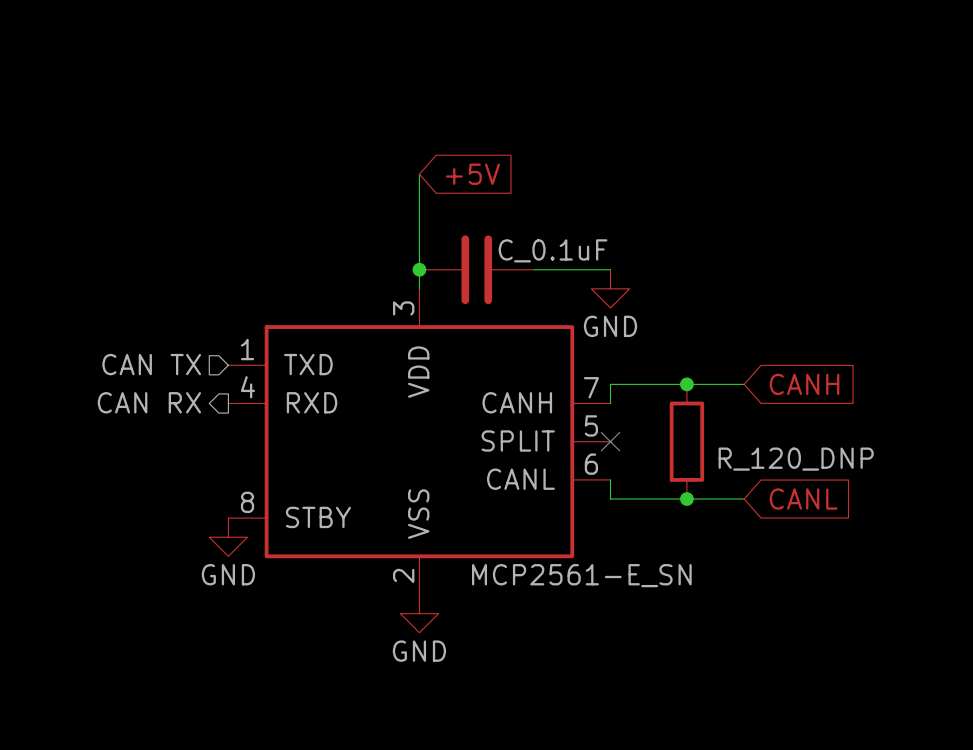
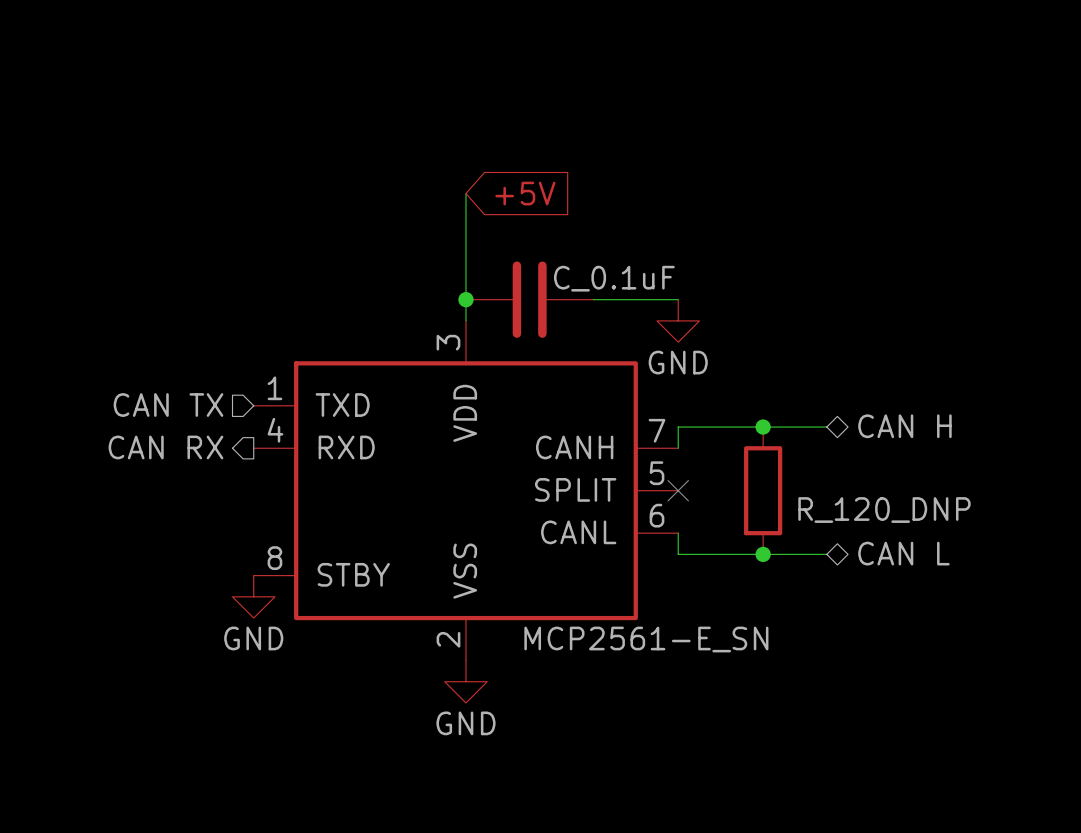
hierarchical label: none -> CAN H (904, 426)
global label: CANH (804, 384) -> none
hierarchical label: none -> CAN L (903, 553)
global label: CANL (803, 499) -> none

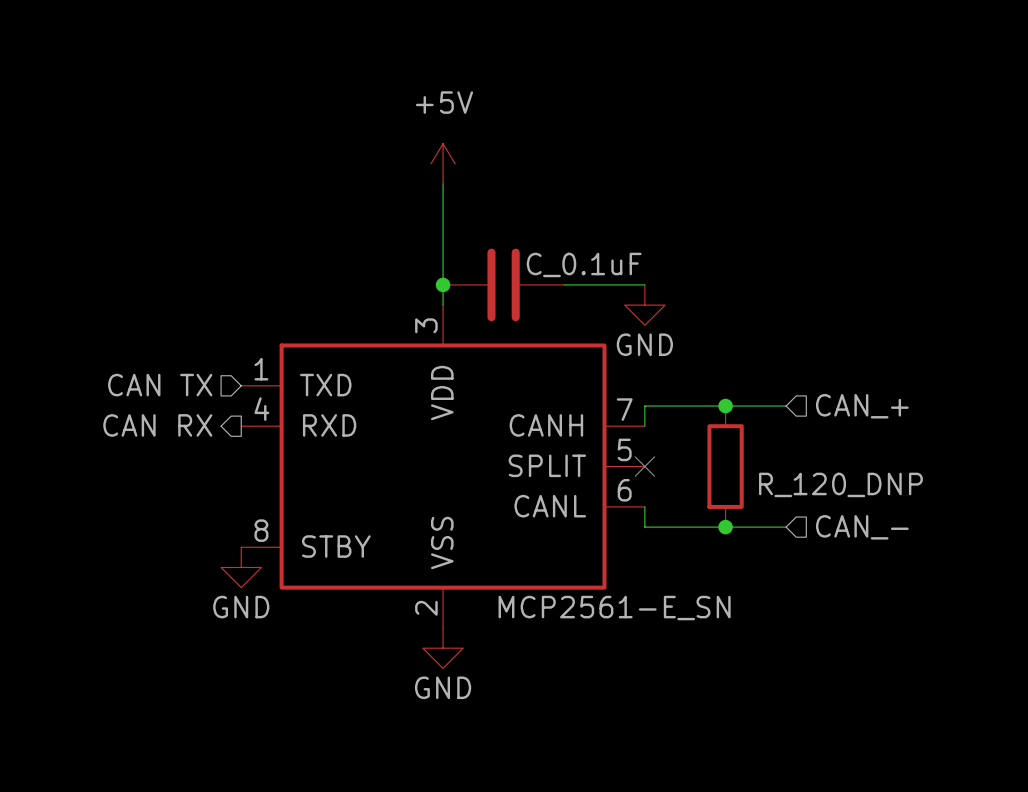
power symbol: none -> +5V (443, 163)
global label: +5V (525, 193) -> none
hierarchical label shape: bidirectional (904, 426) -> input (862, 406)
hierarchical label: CAN H (904, 426) -> CAN_+ (862, 406)
hierarchical label shape: bidirectional (903, 553) -> input (862, 527)
hierarchical label: CAN L (903, 553) -> CAN_- (862, 527)

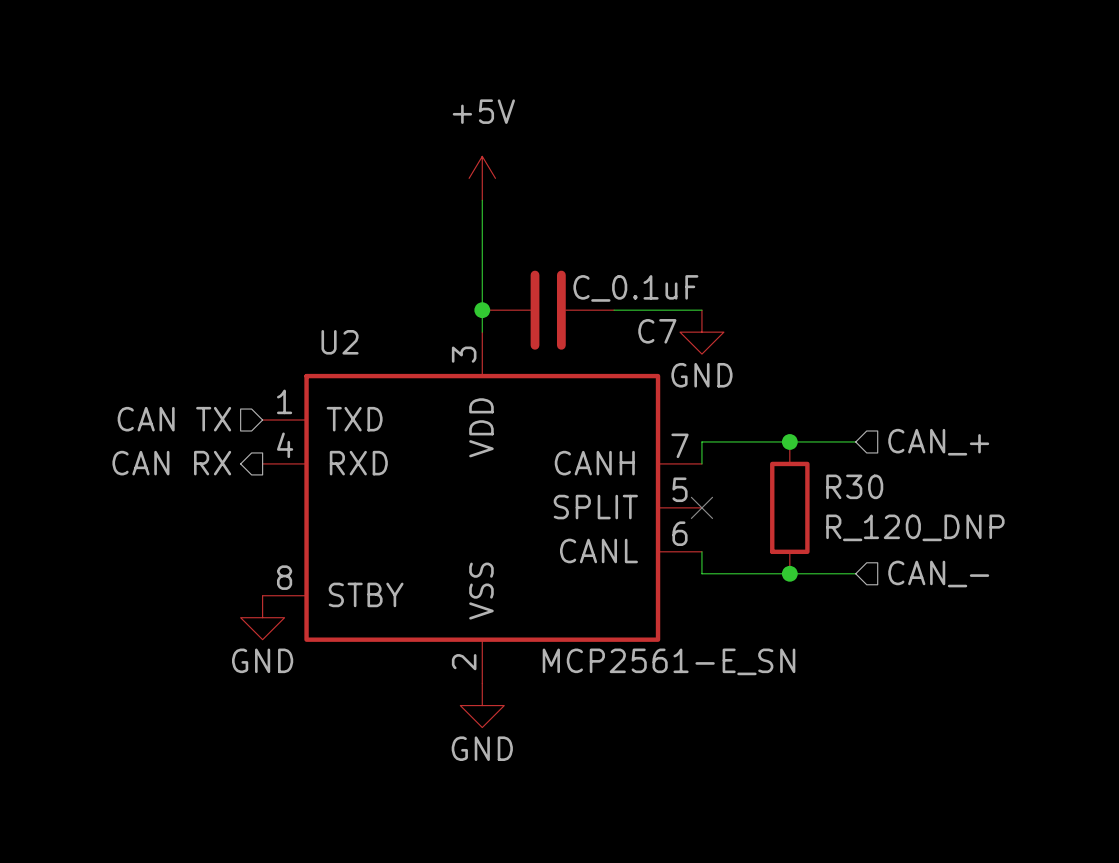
C7 name: none -> C7 (657, 331)
U2 name: none -> U2 (340, 342)
R30 name: none -> R30 (854, 486)

